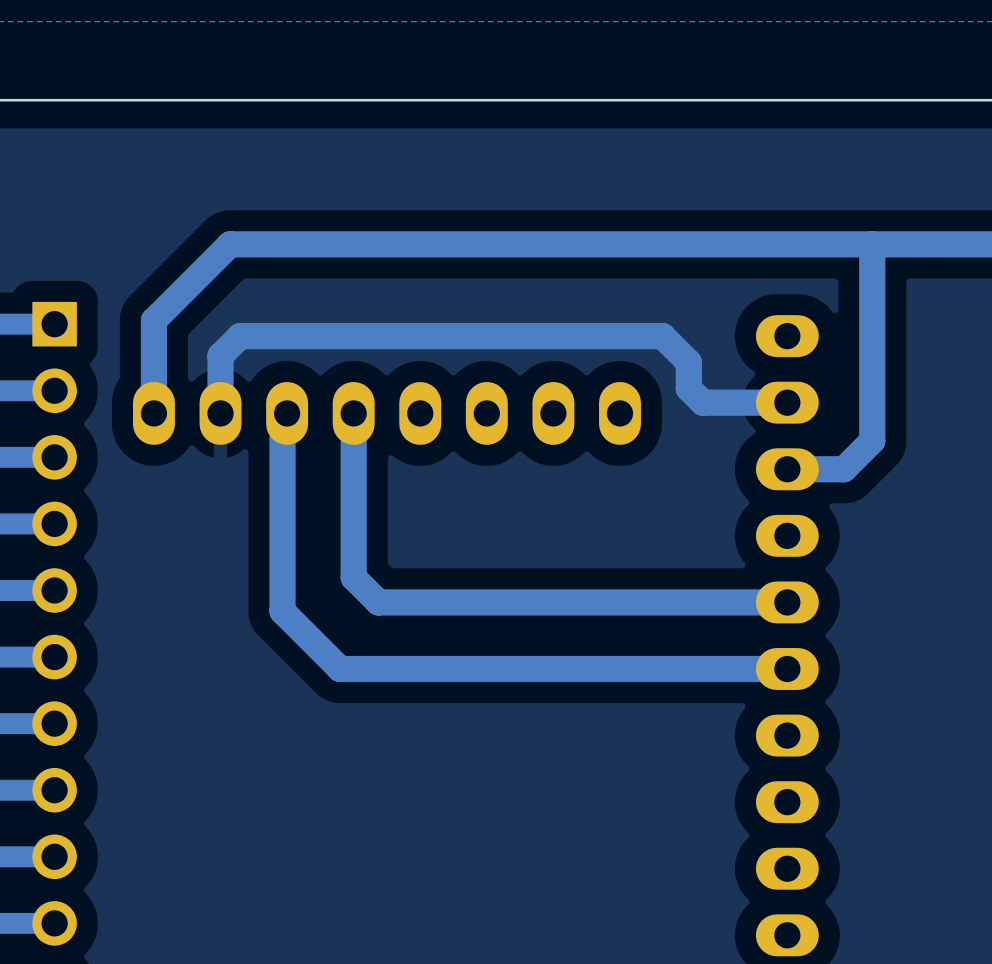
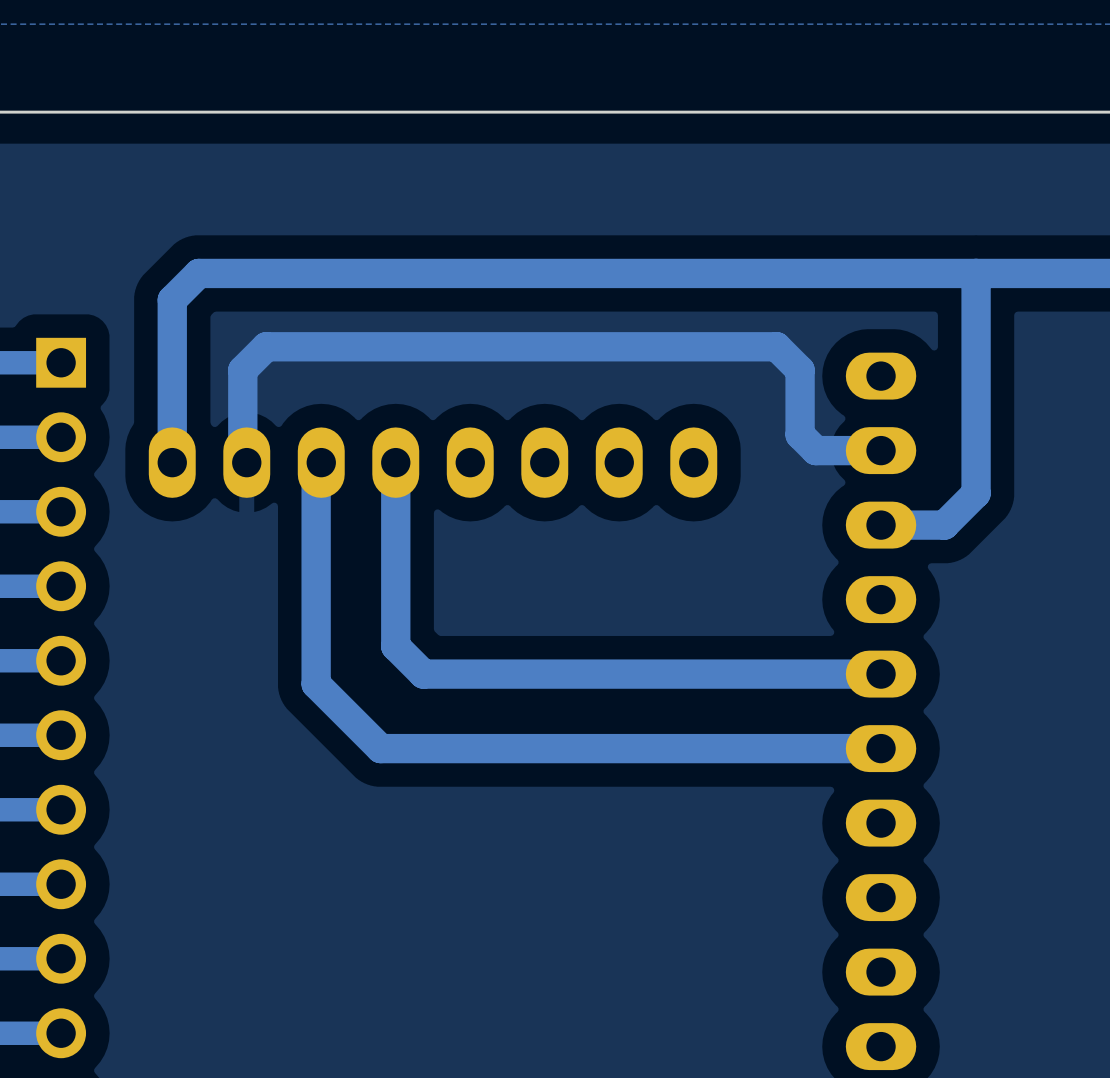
track: (230, 244) (153, 320) -> (257, 273) (198, 273) (172, 299) (172, 358)
track: (729, 402) (702, 402) (688, 388) (688, 362) (662, 336) (240, 336) (220, 355) (220, 413) -> (815, 450) (800, 434) (800, 370) (776, 346) (266, 346) (242, 370) (242, 458) (246, 462)

